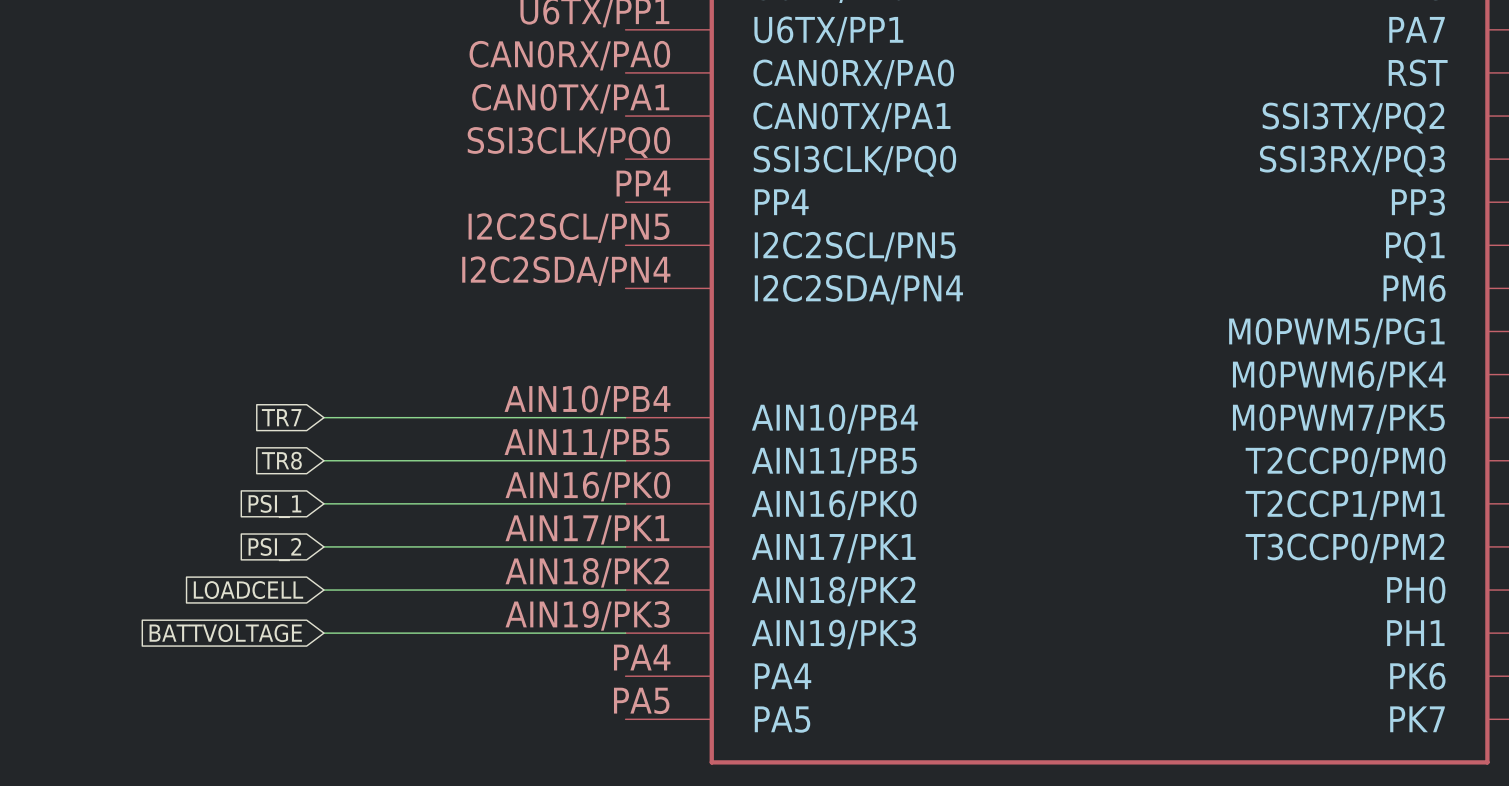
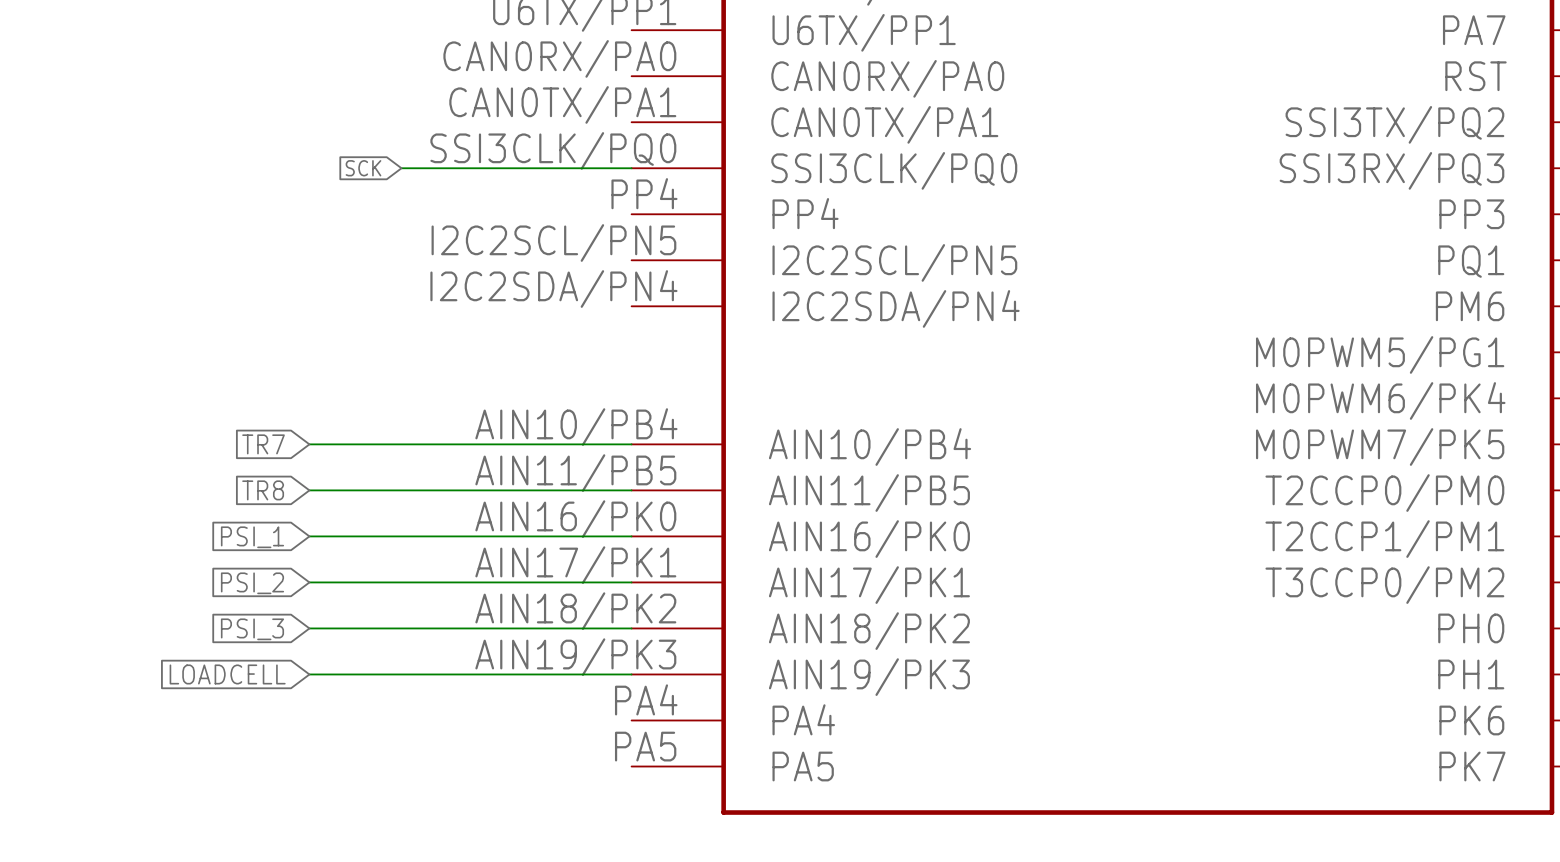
global label: none -> SCK (363, 168)
wire: none -> (401, 168) (631, 168)
global label: LOADCELL (248, 590) -> PSI_3 (252, 629)
global label: BATTVOLTAGE (225, 633) -> LOADCELL (227, 674)

